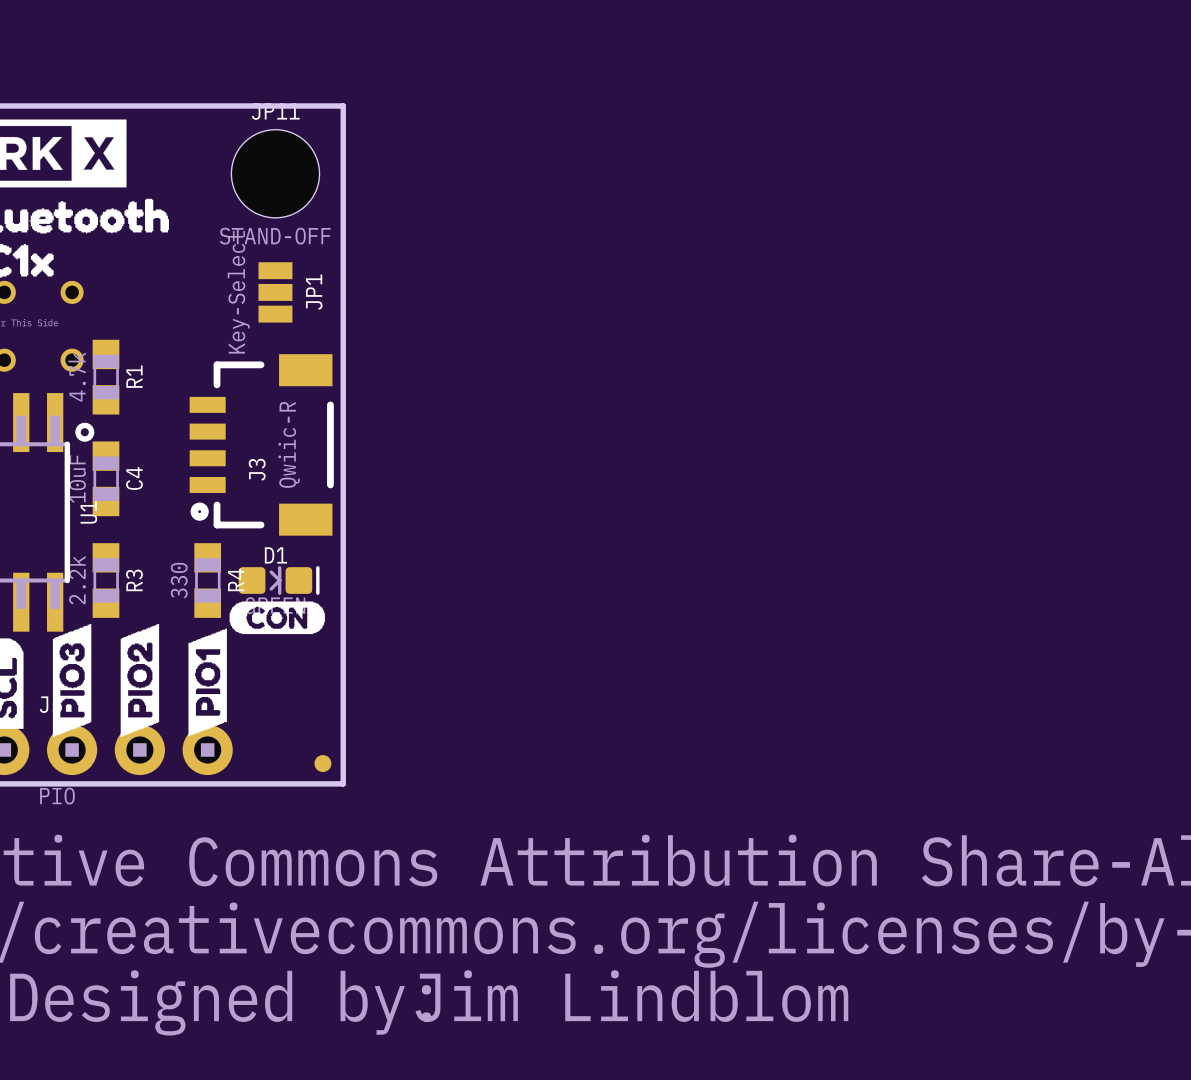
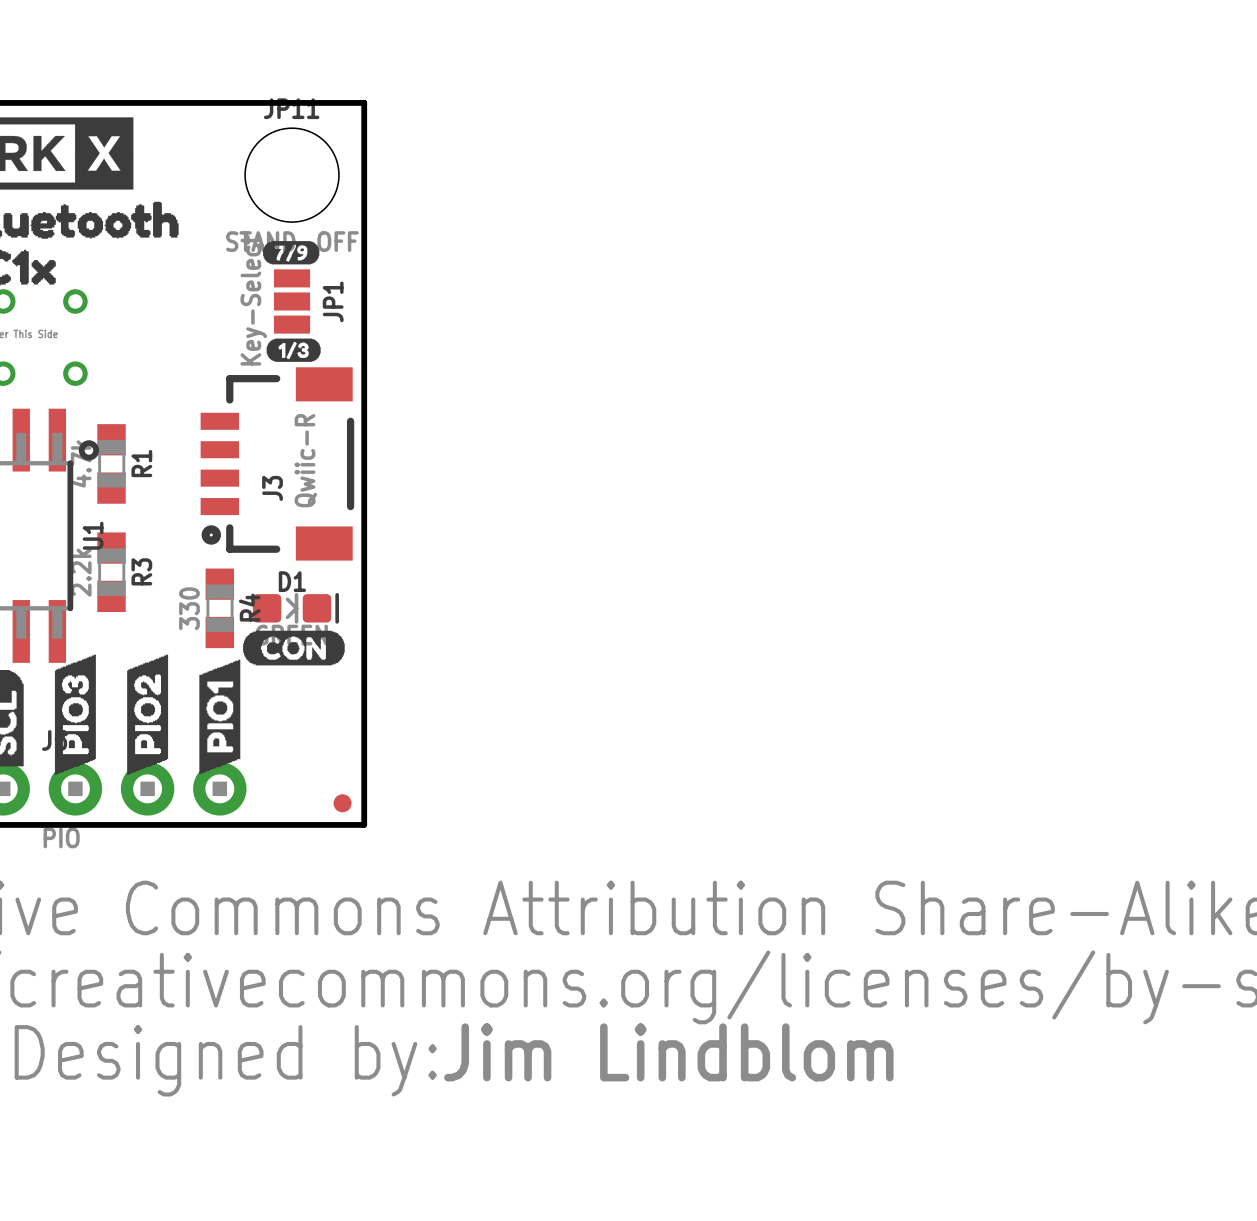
drawing: none -> [263, 241, 320, 265]
drawing: none -> [266, 338, 321, 362]
R1 position: (105, 377) -> (111, 463)
C4: 10uF (105, 478) -> none
R3 position: (105, 580) -> (111, 572)

